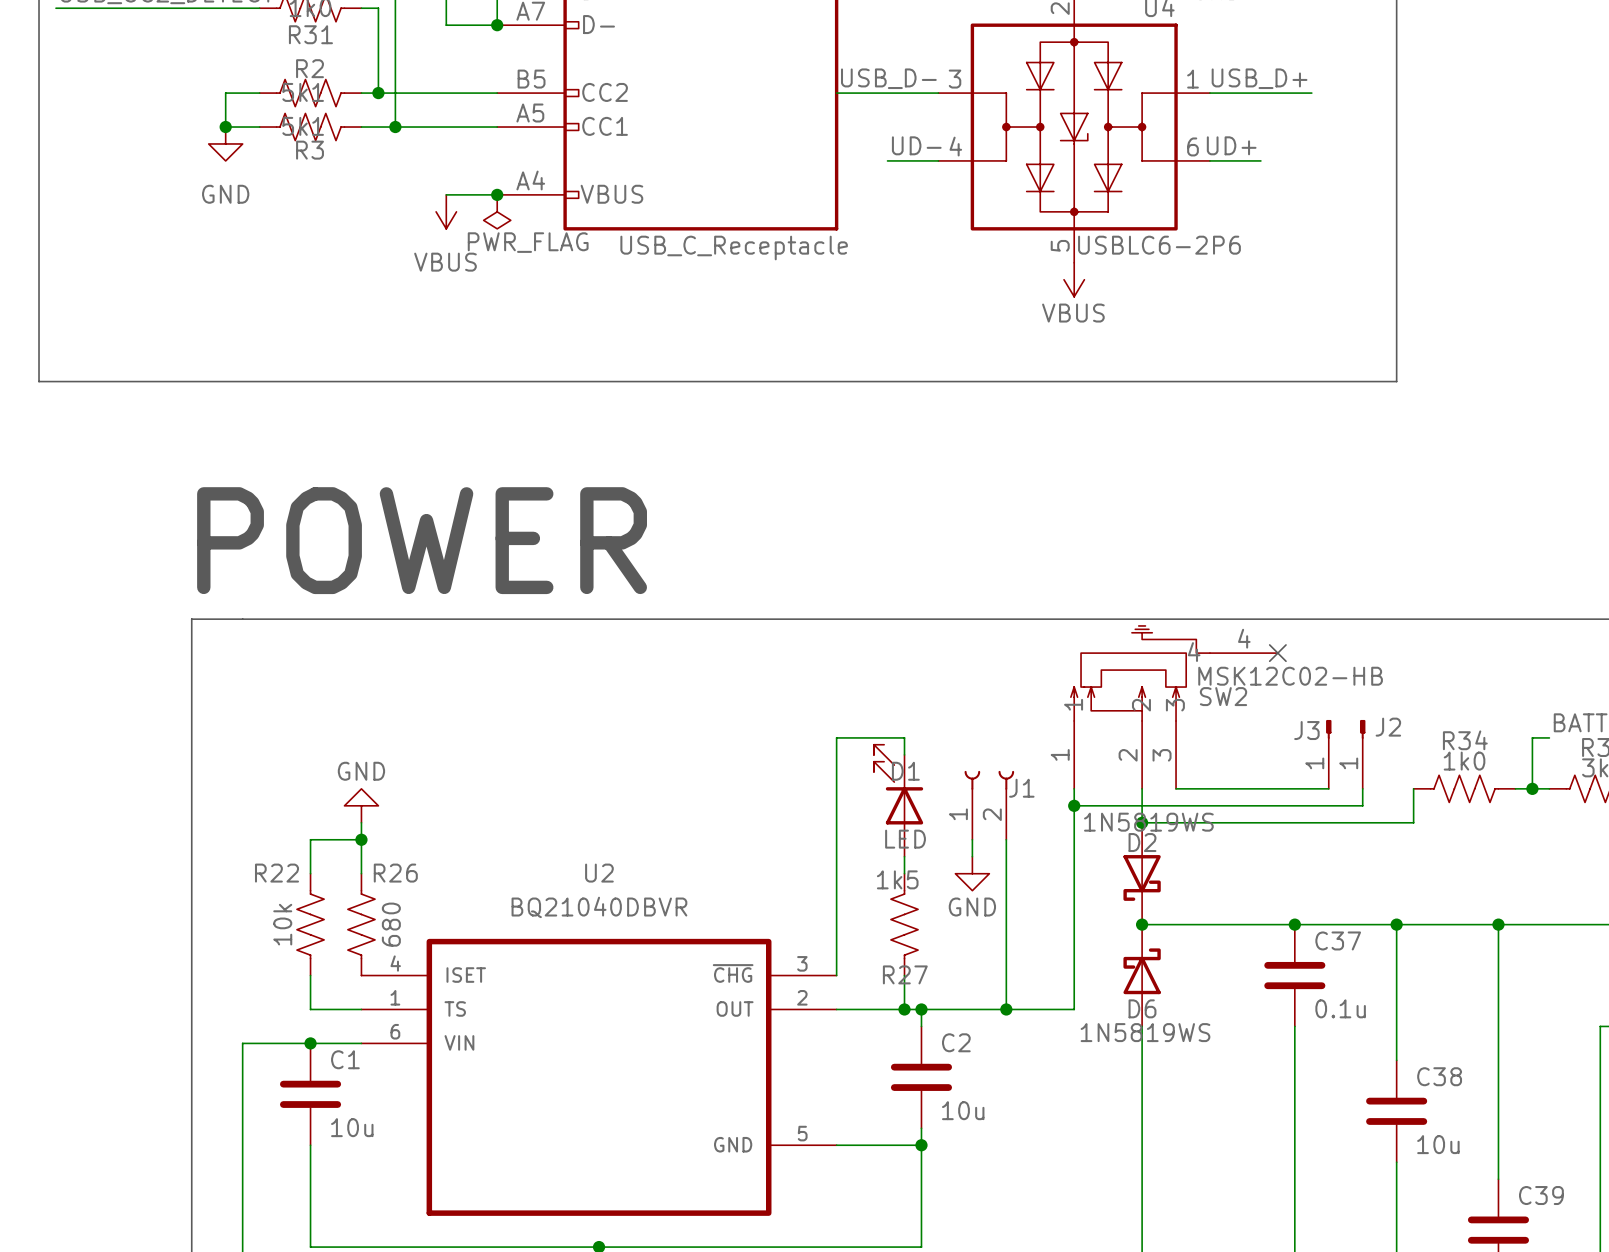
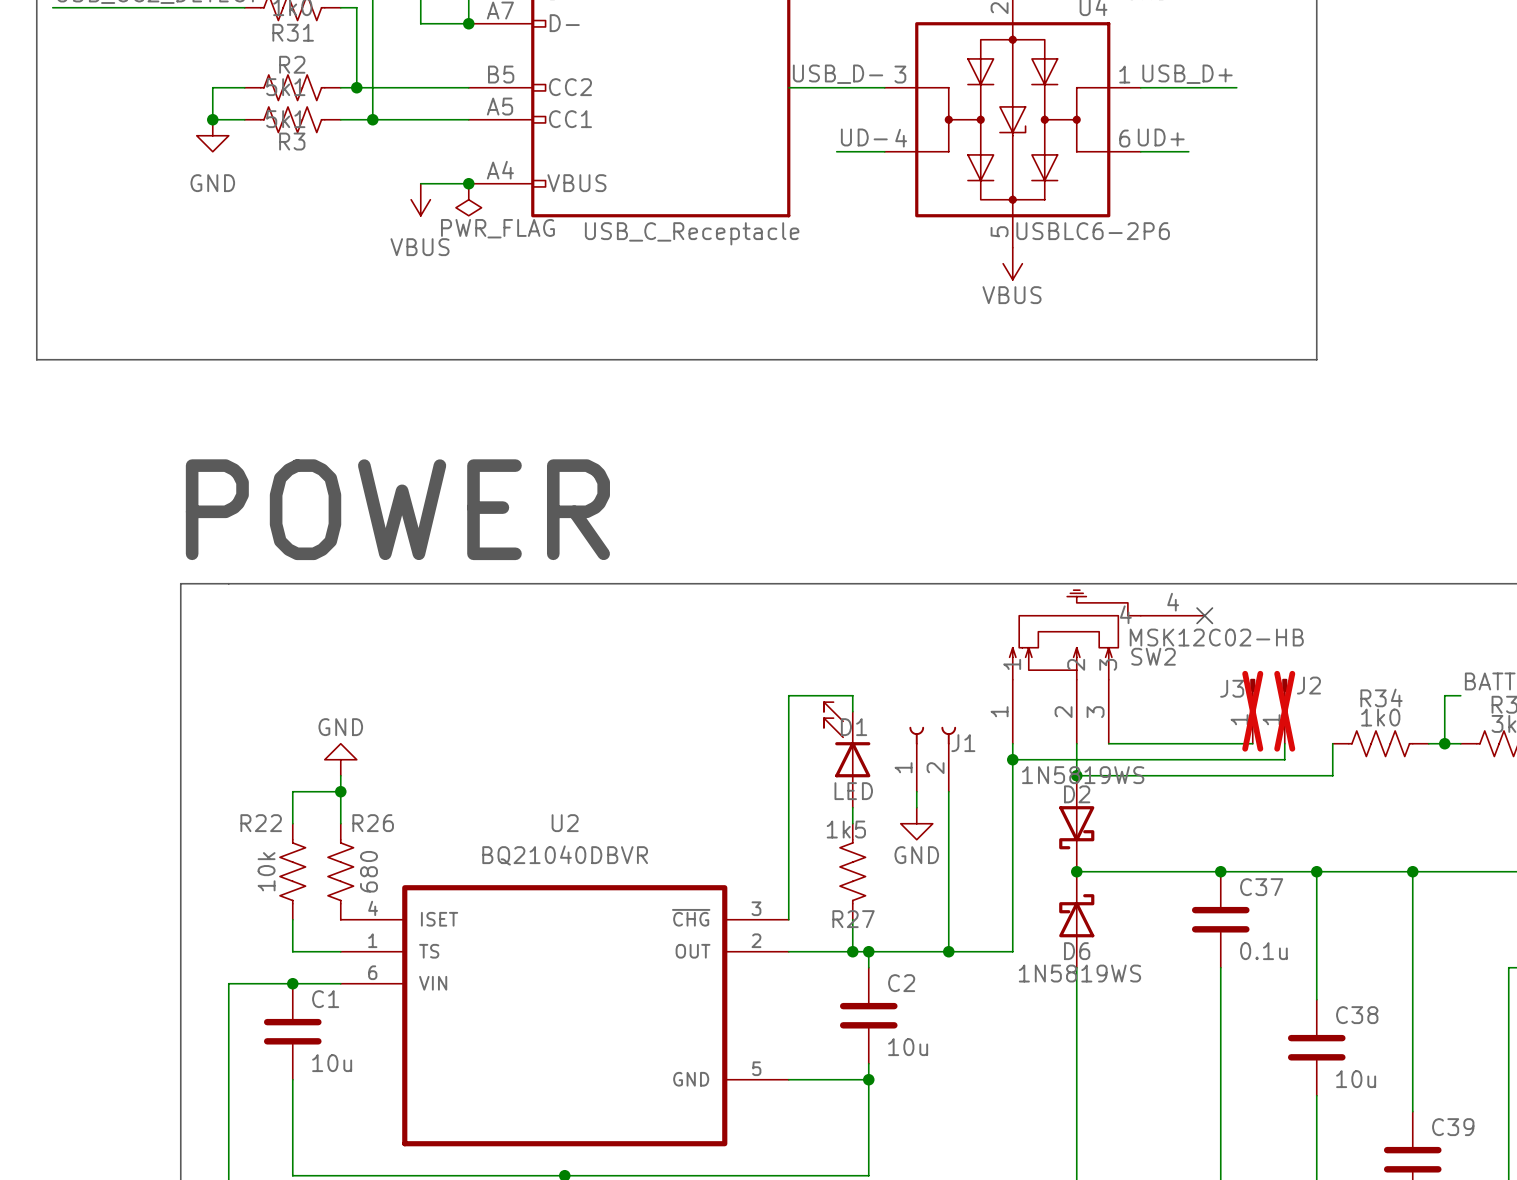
J3 do-not-place cross: none -> (1252, 711)
J2 do-not-place cross: none -> (1284, 711)

